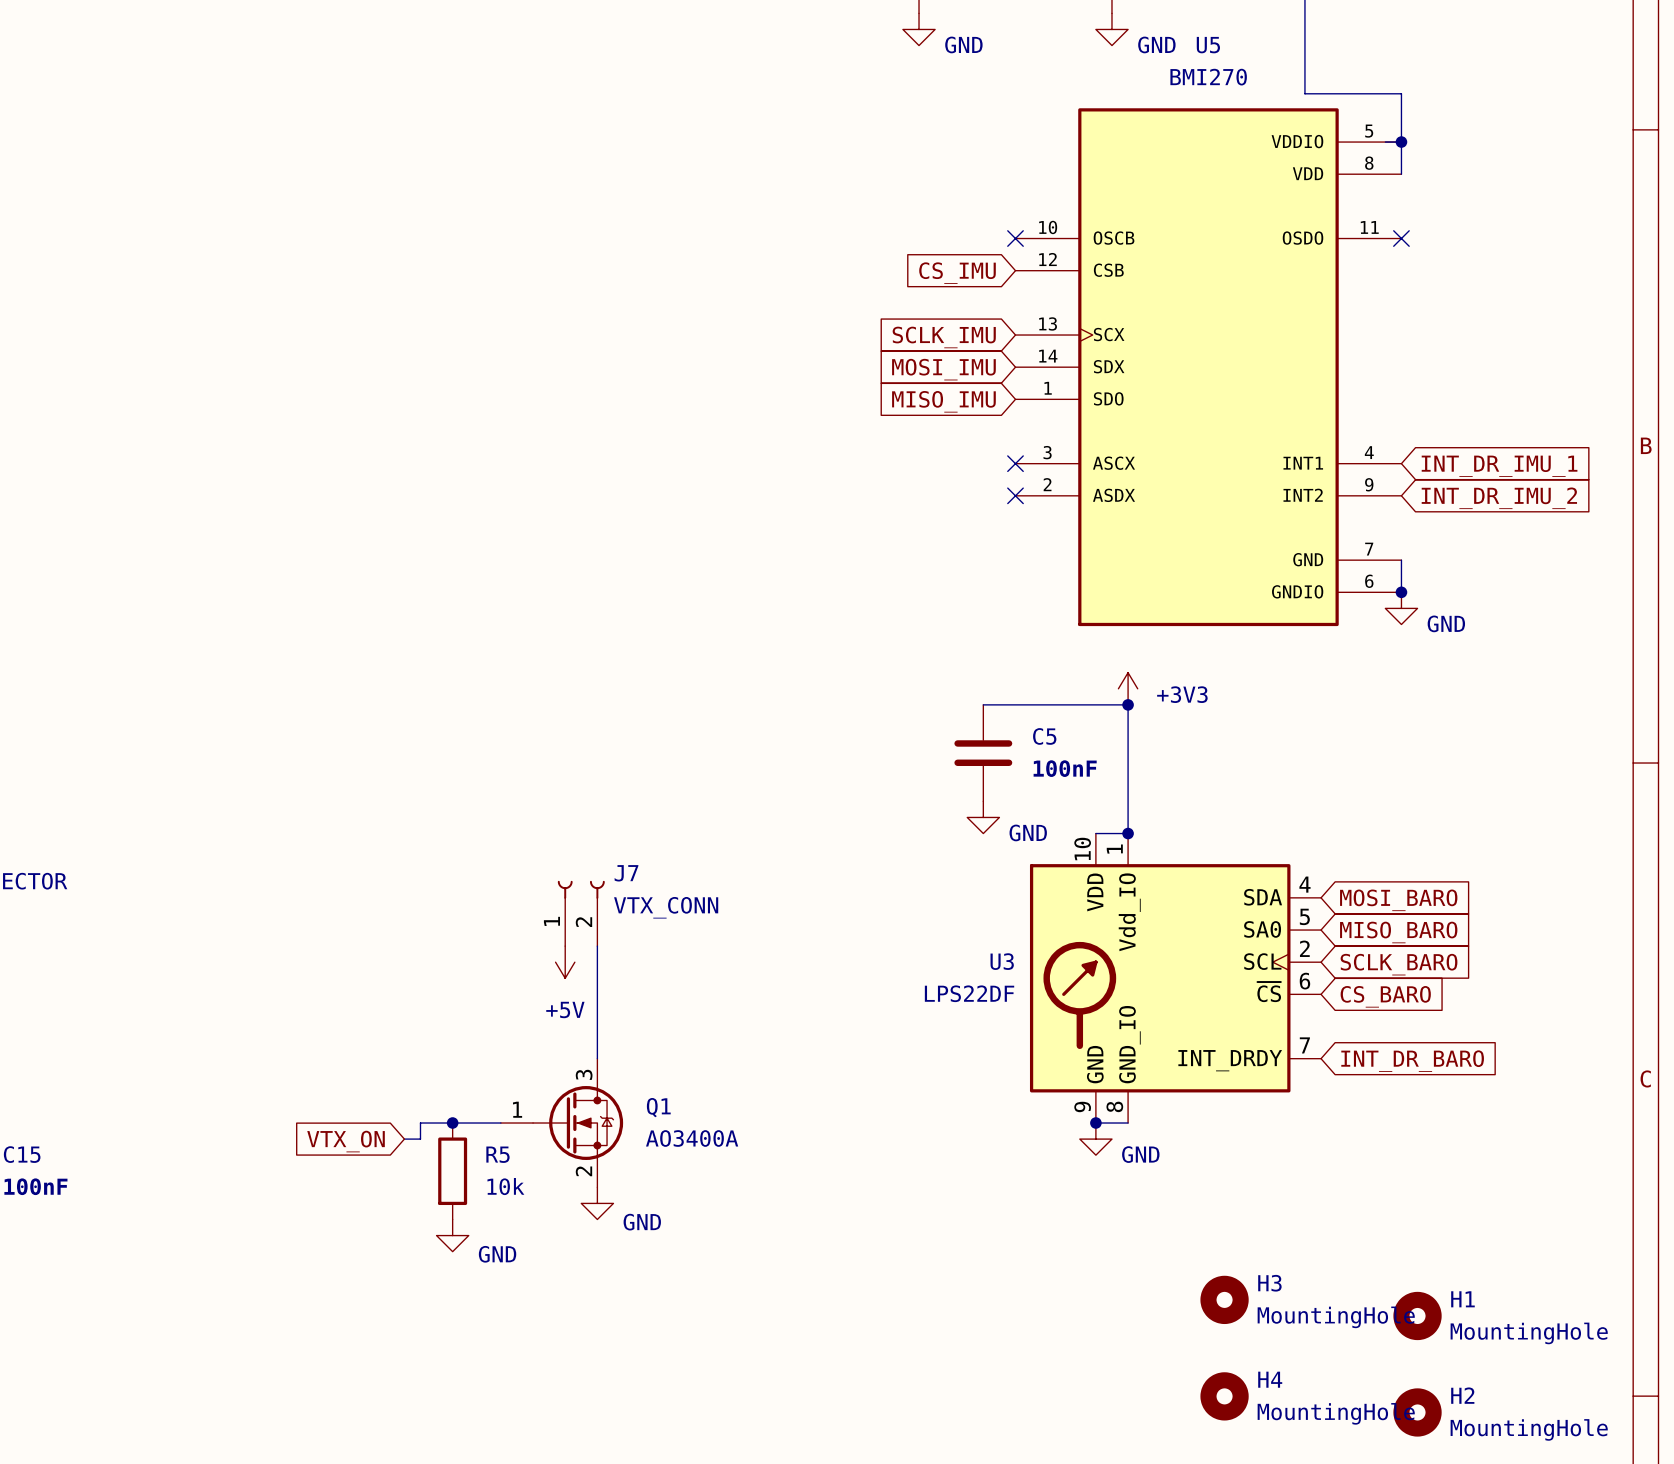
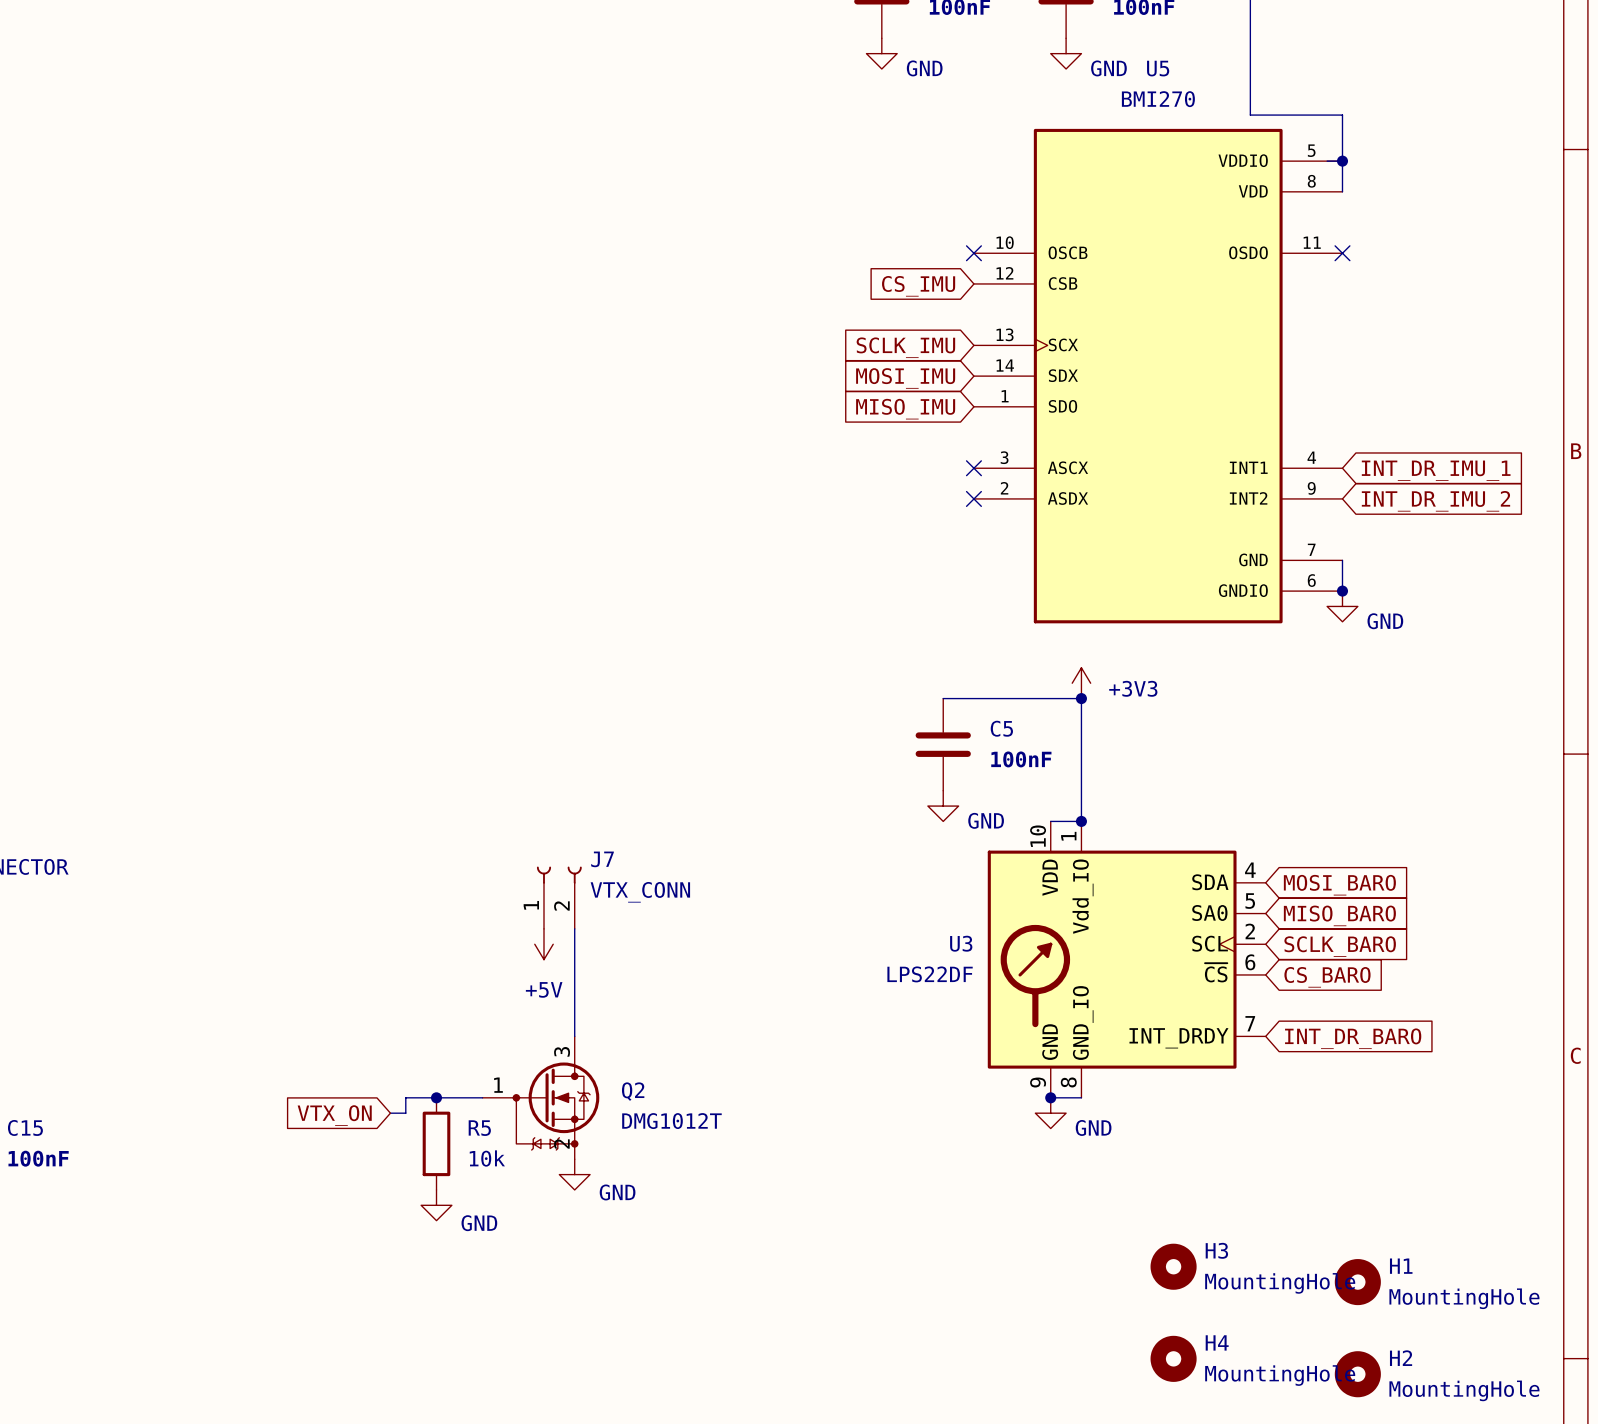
Q1: AO3400A (562, 1123) -> none
Q2: none -> DMG1012T (540, 1097)

